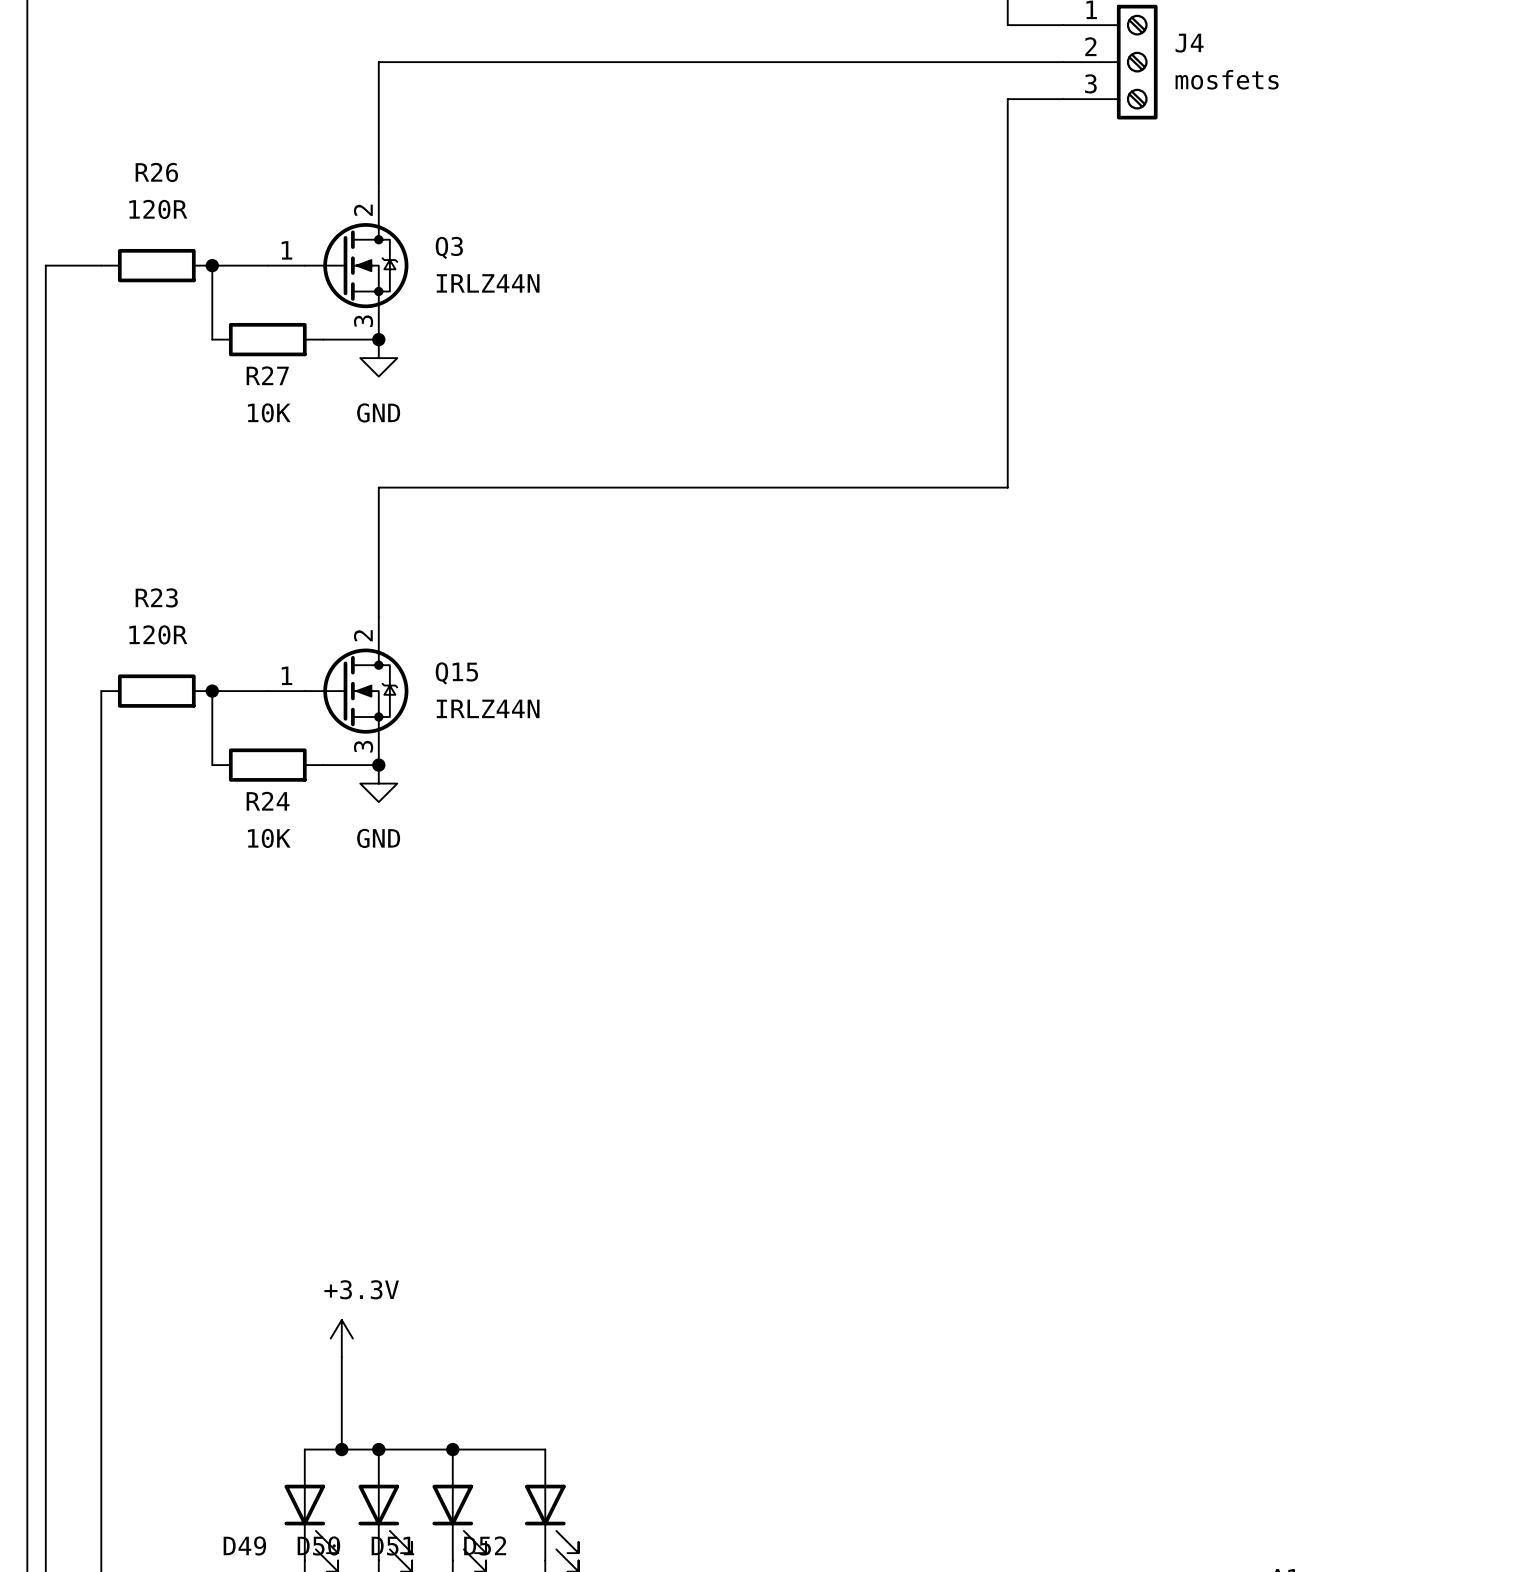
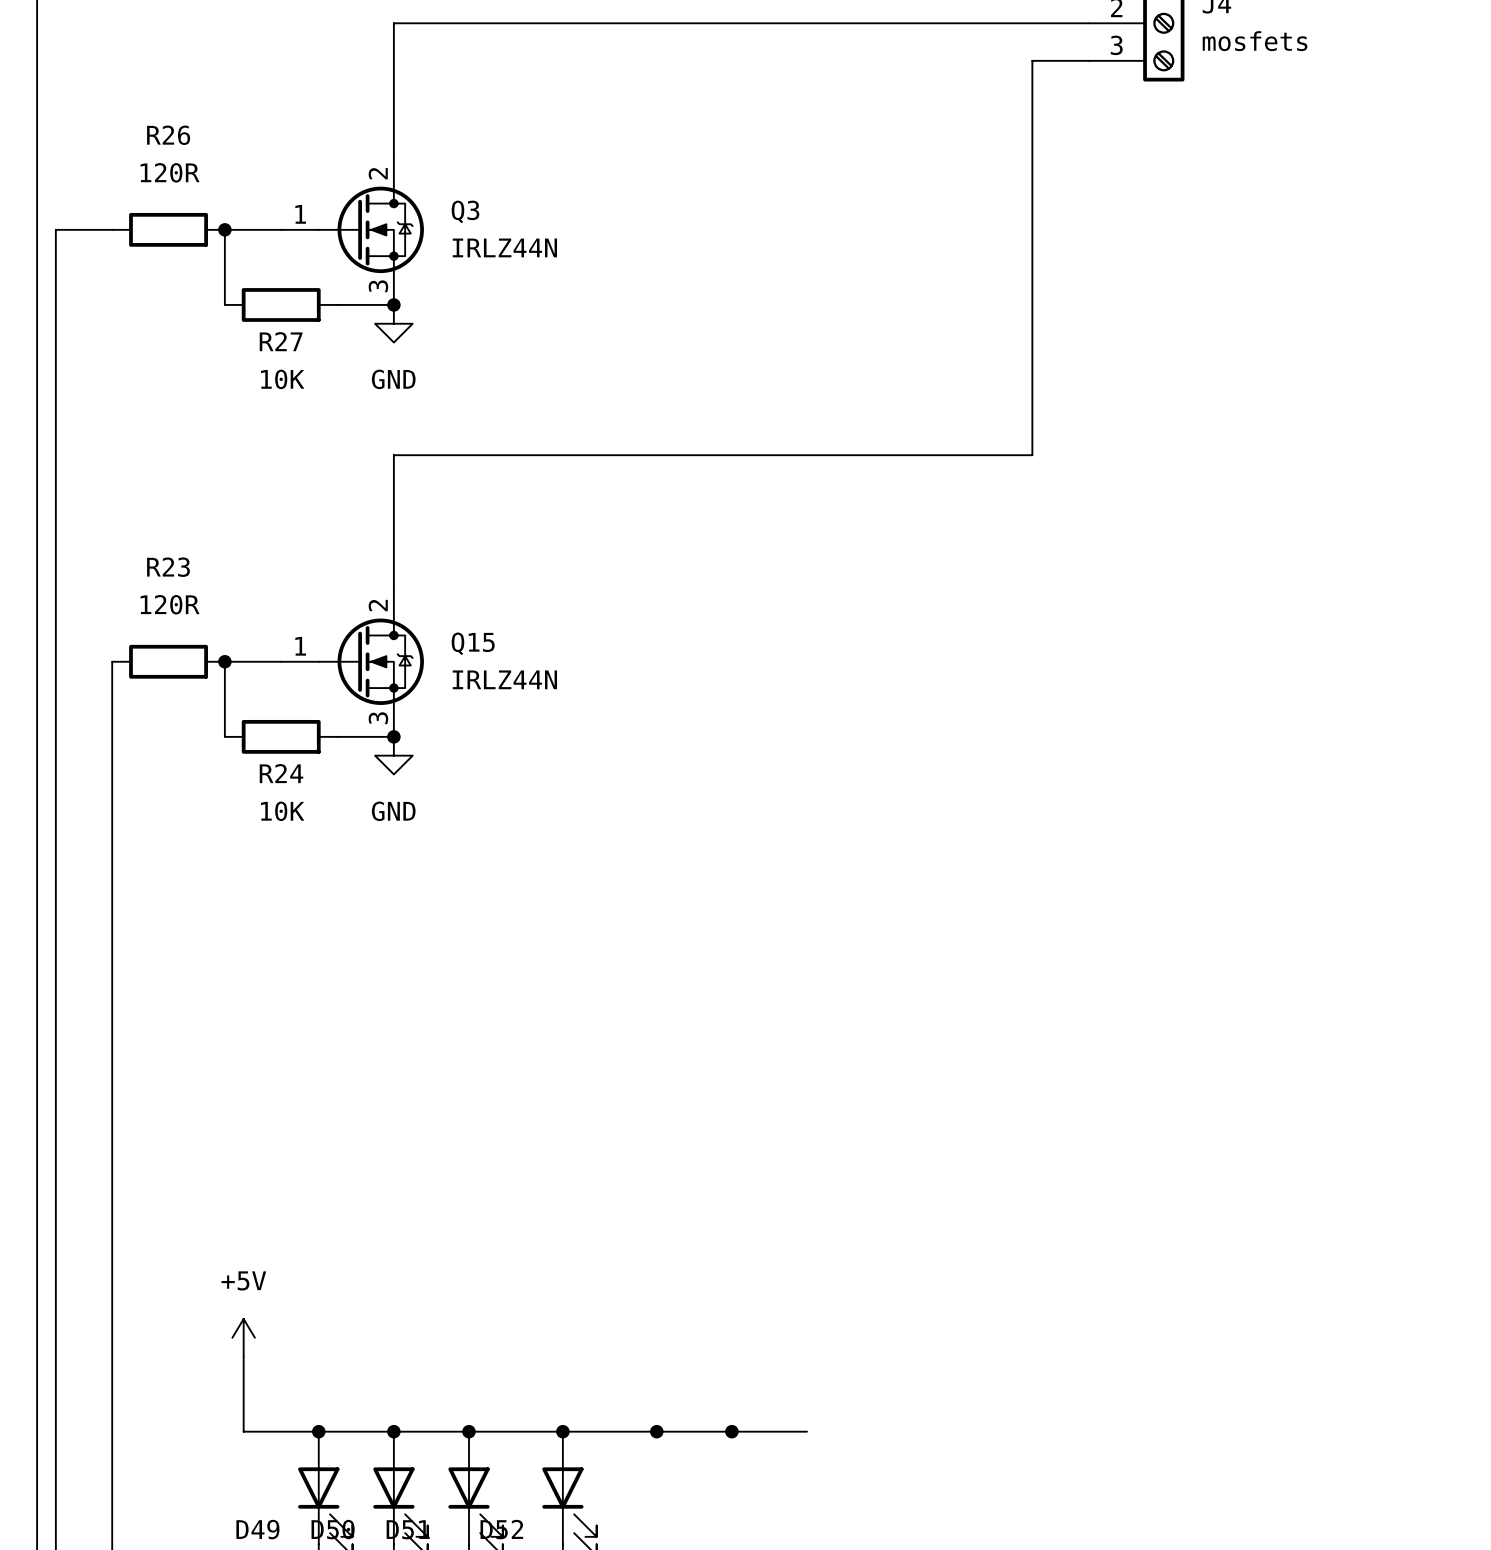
power symbol: +3.3V (341, 1338) -> none
power symbol: none -> +5V (243, 1337)
wire: (341, 1357) (341, 1449) -> none
wire: none -> (243, 1356) (243, 1431) (318, 1431)
junction position: (341, 1449) -> (318, 1431)
wire: none -> (562, 1431) (807, 1431)
junction: none -> (562, 1431)
junction: none -> (656, 1431)
junction: none -> (731, 1431)

